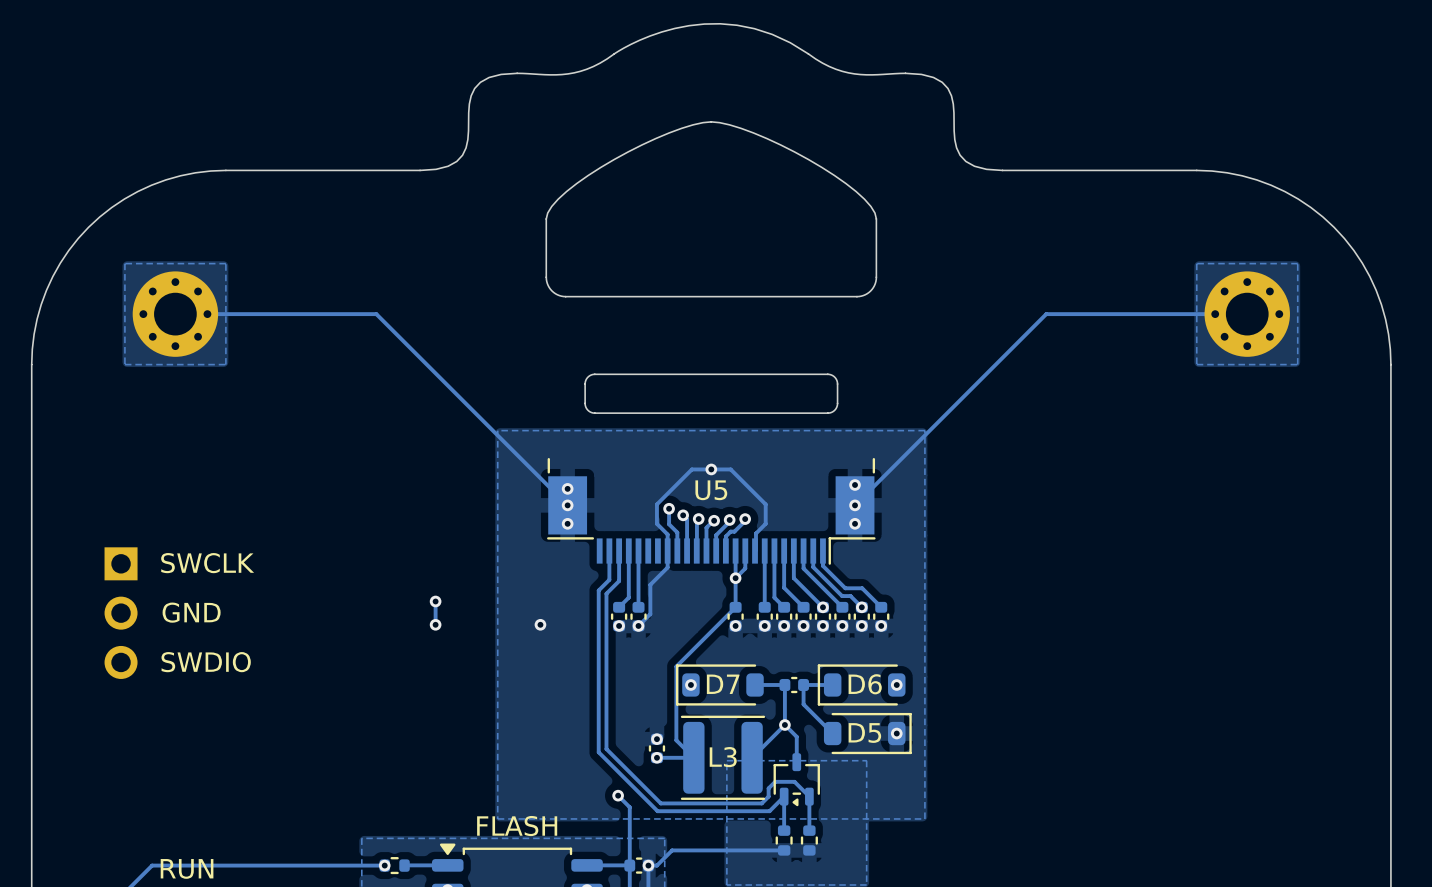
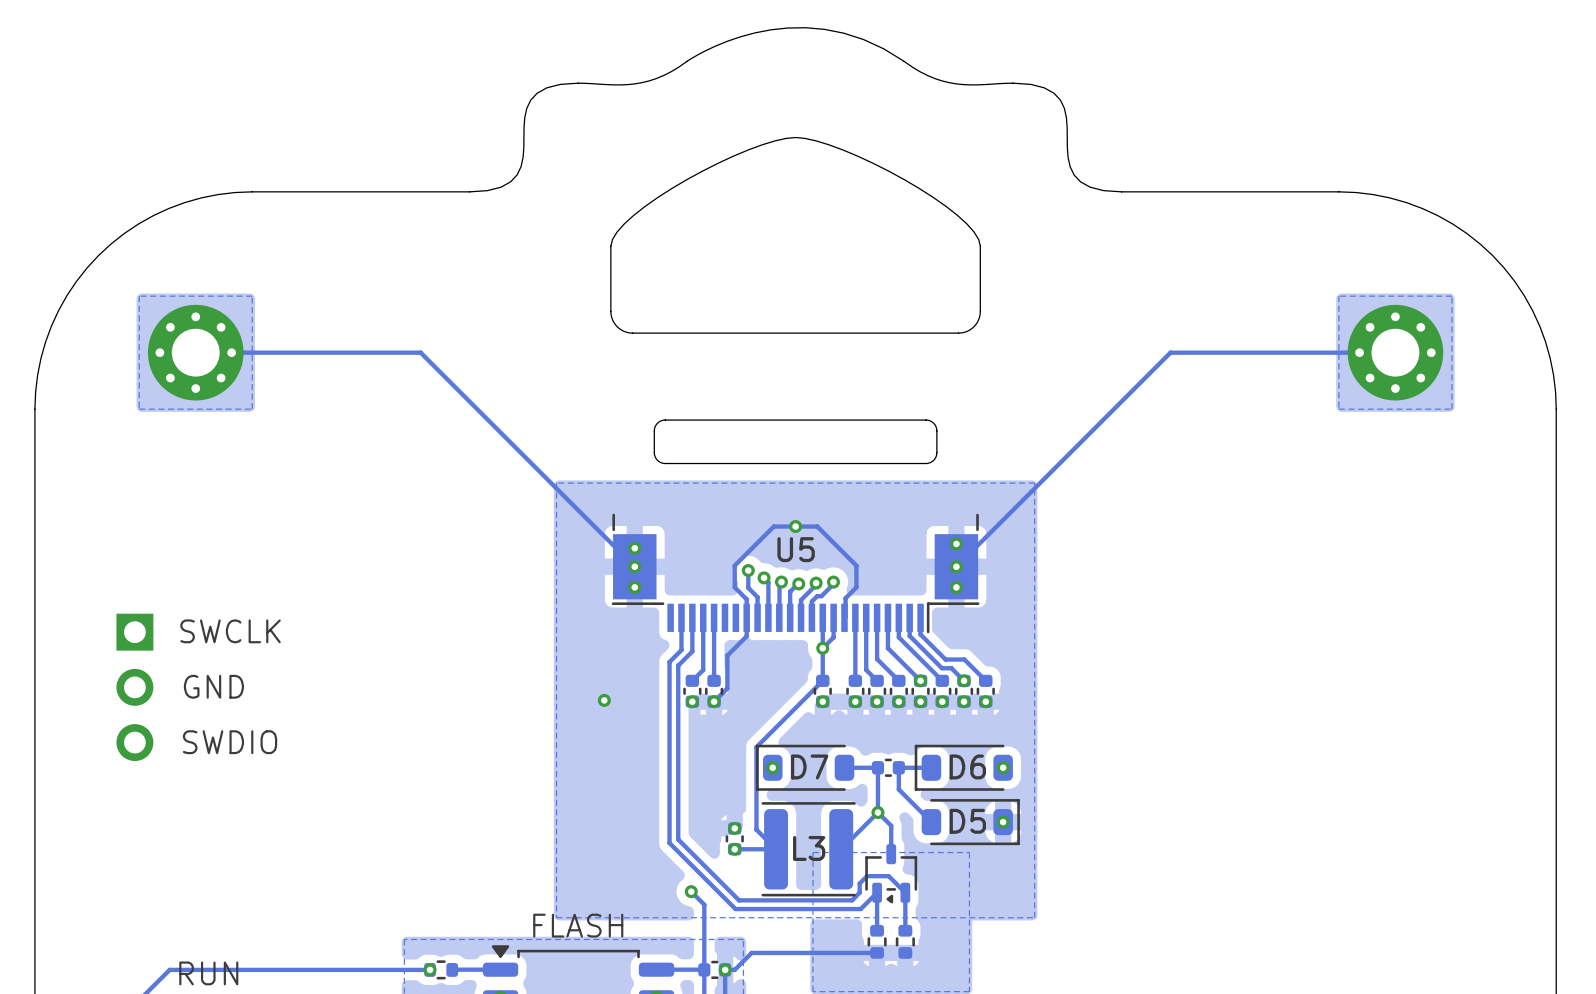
track: (435, 601) (435, 624) -> none
via: (435, 601) -> none
via: (435, 624) -> none

